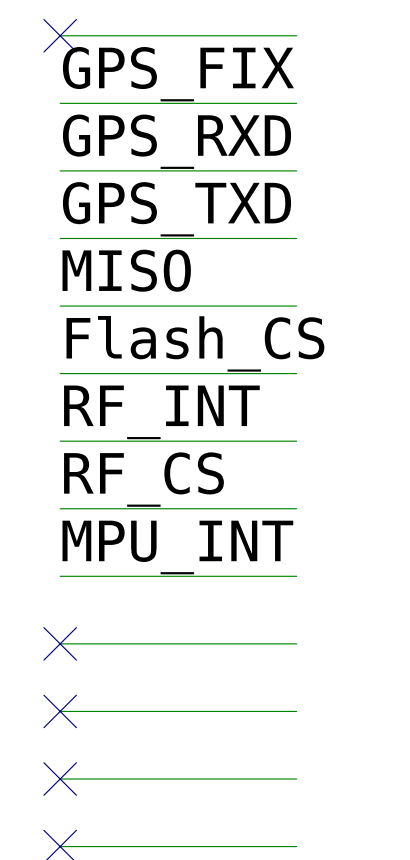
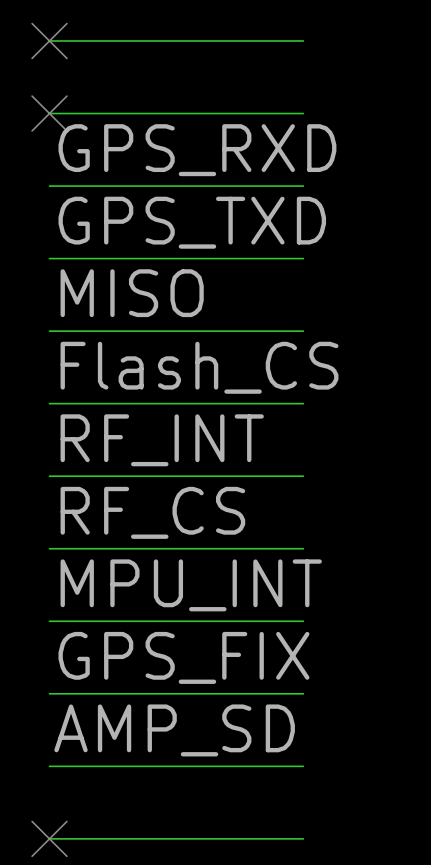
label position: GPS_FIX (178, 74) -> GPS_FIX (183, 657)
no-connect mark: none -> (49, 113)
no-connect mark: (60, 643) -> none
label: none -> AMP_SD (174, 730)
no-connect mark: (60, 711) -> none

